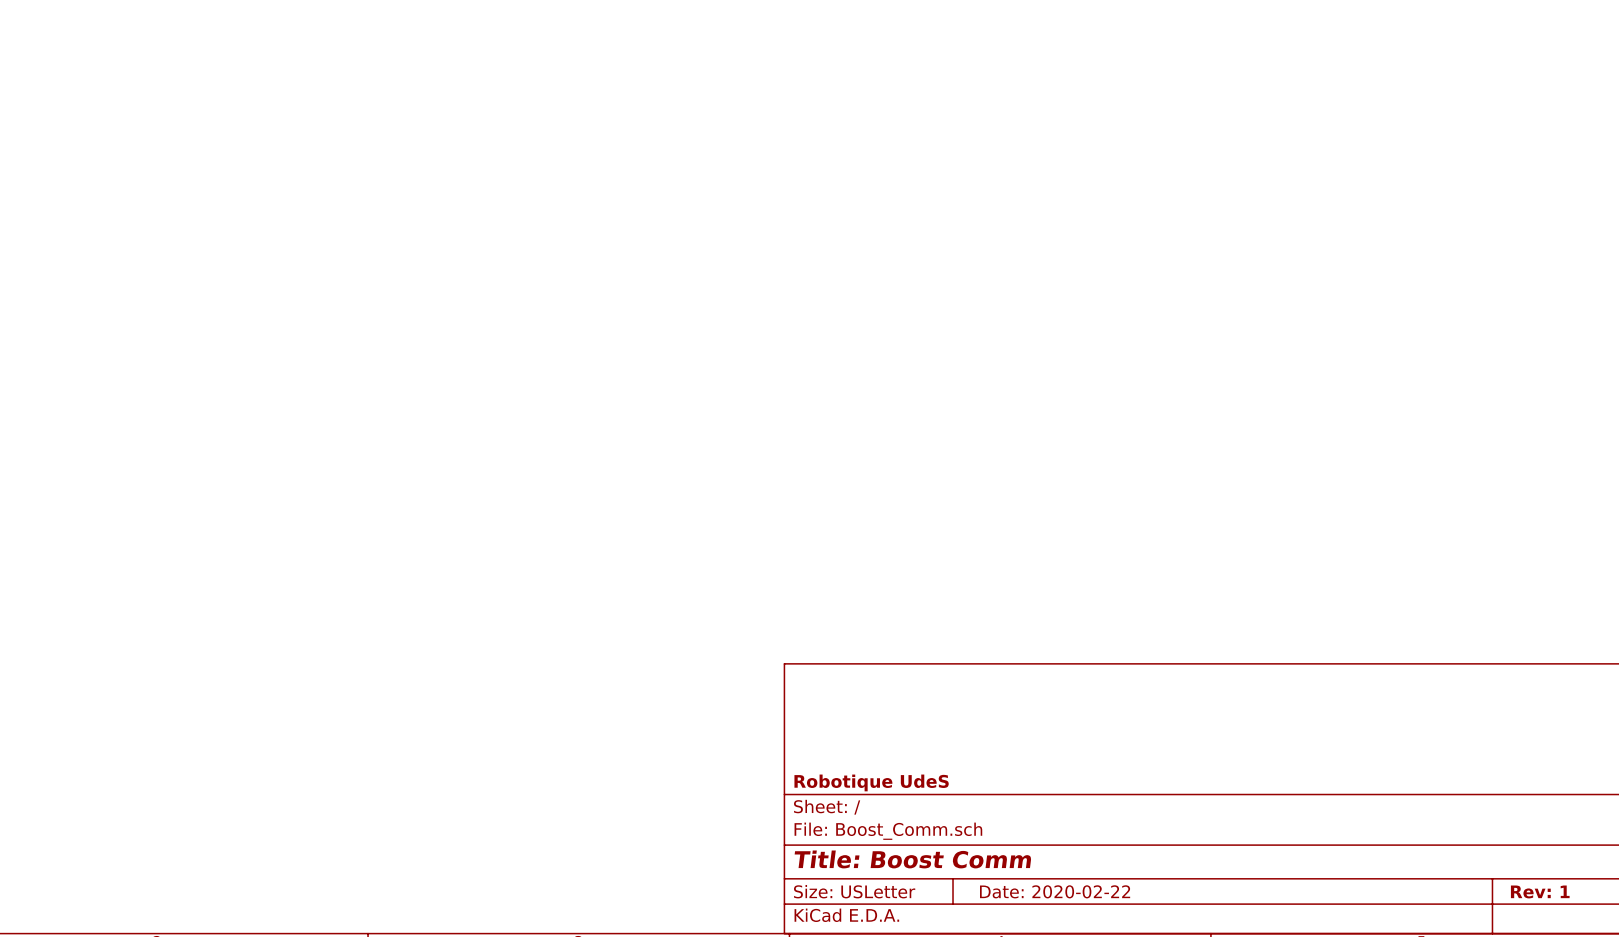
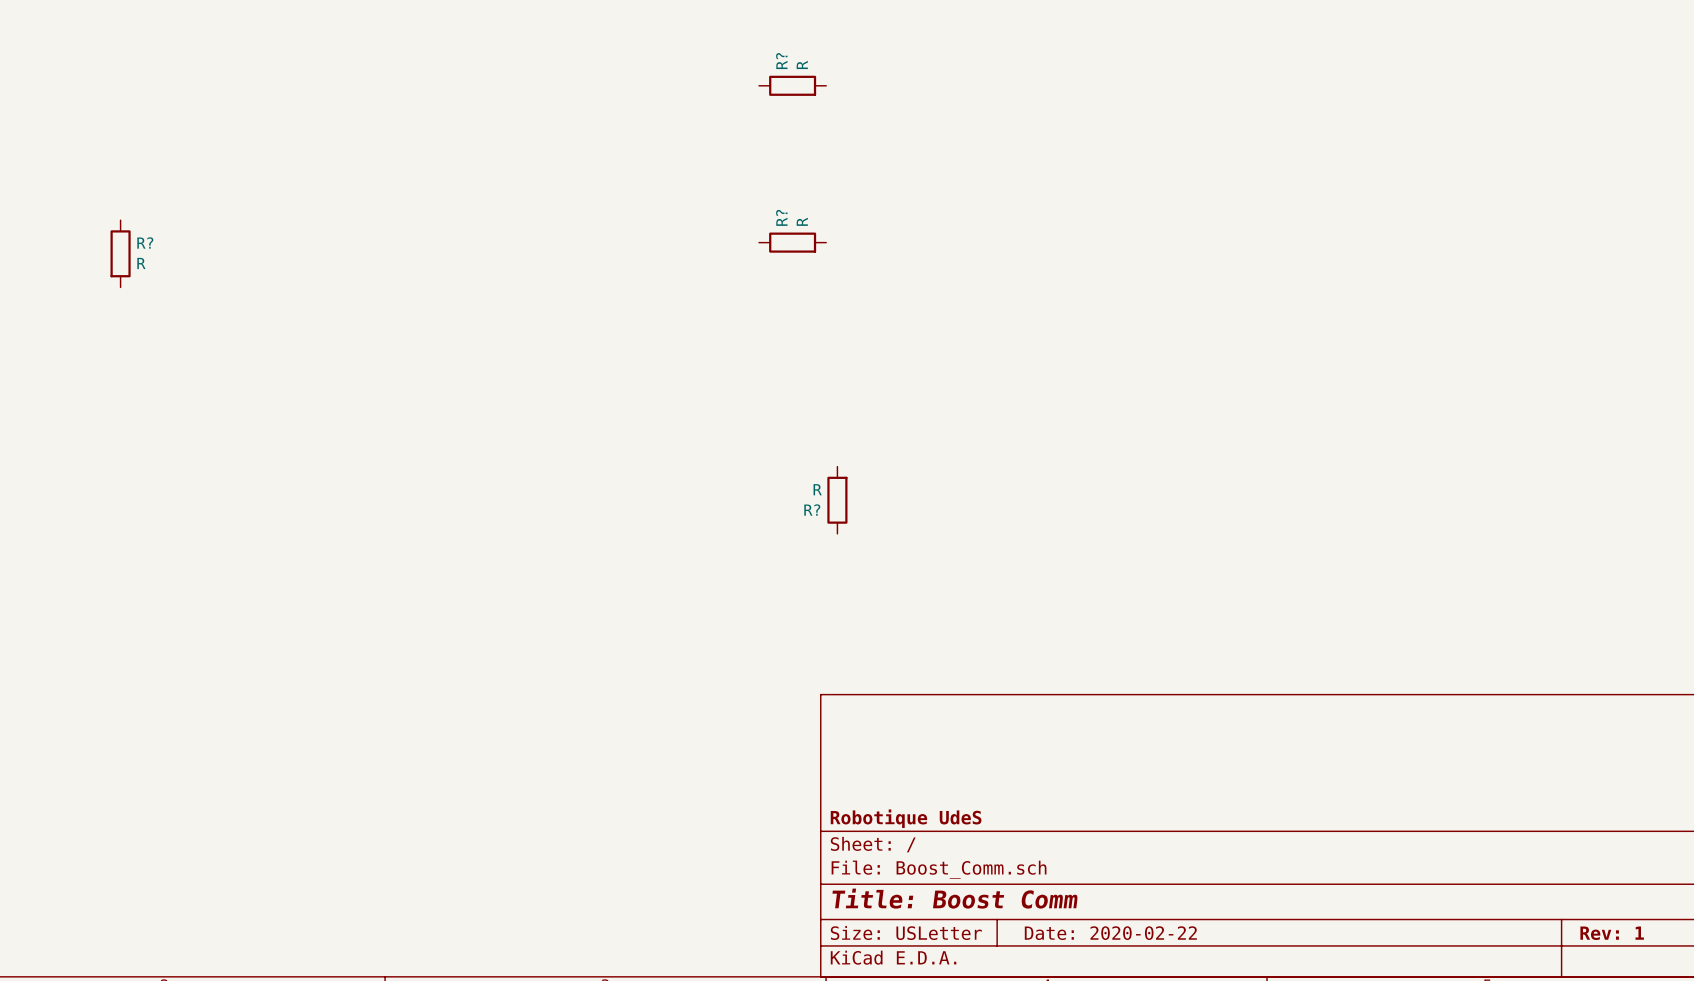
R?: none -> R (792, 85)
R?: none -> R (792, 242)
R?: none -> R (120, 253)
R?: none -> R (837, 500)

